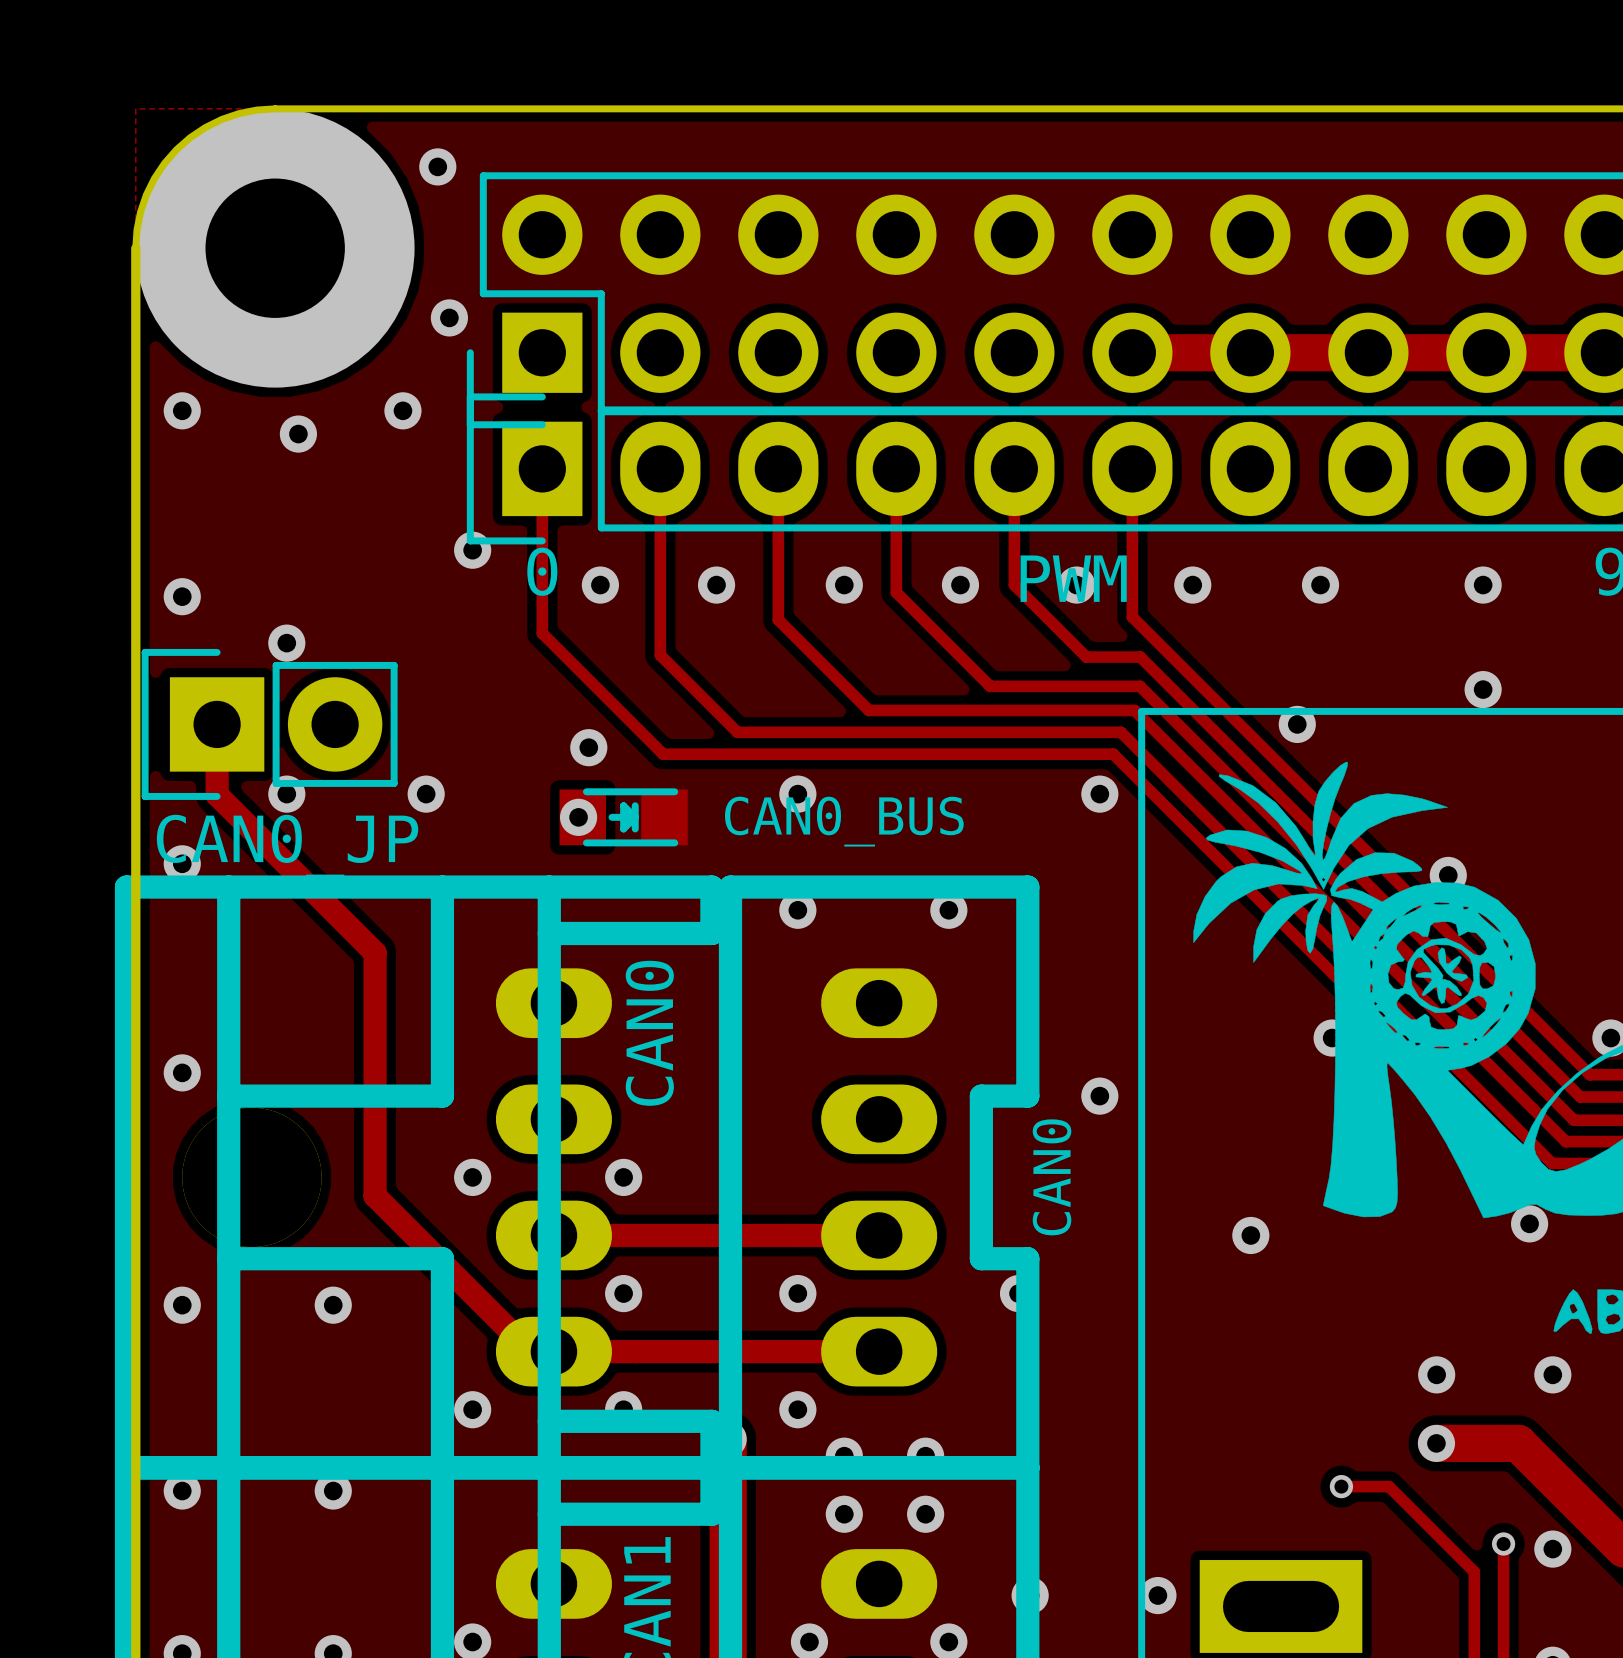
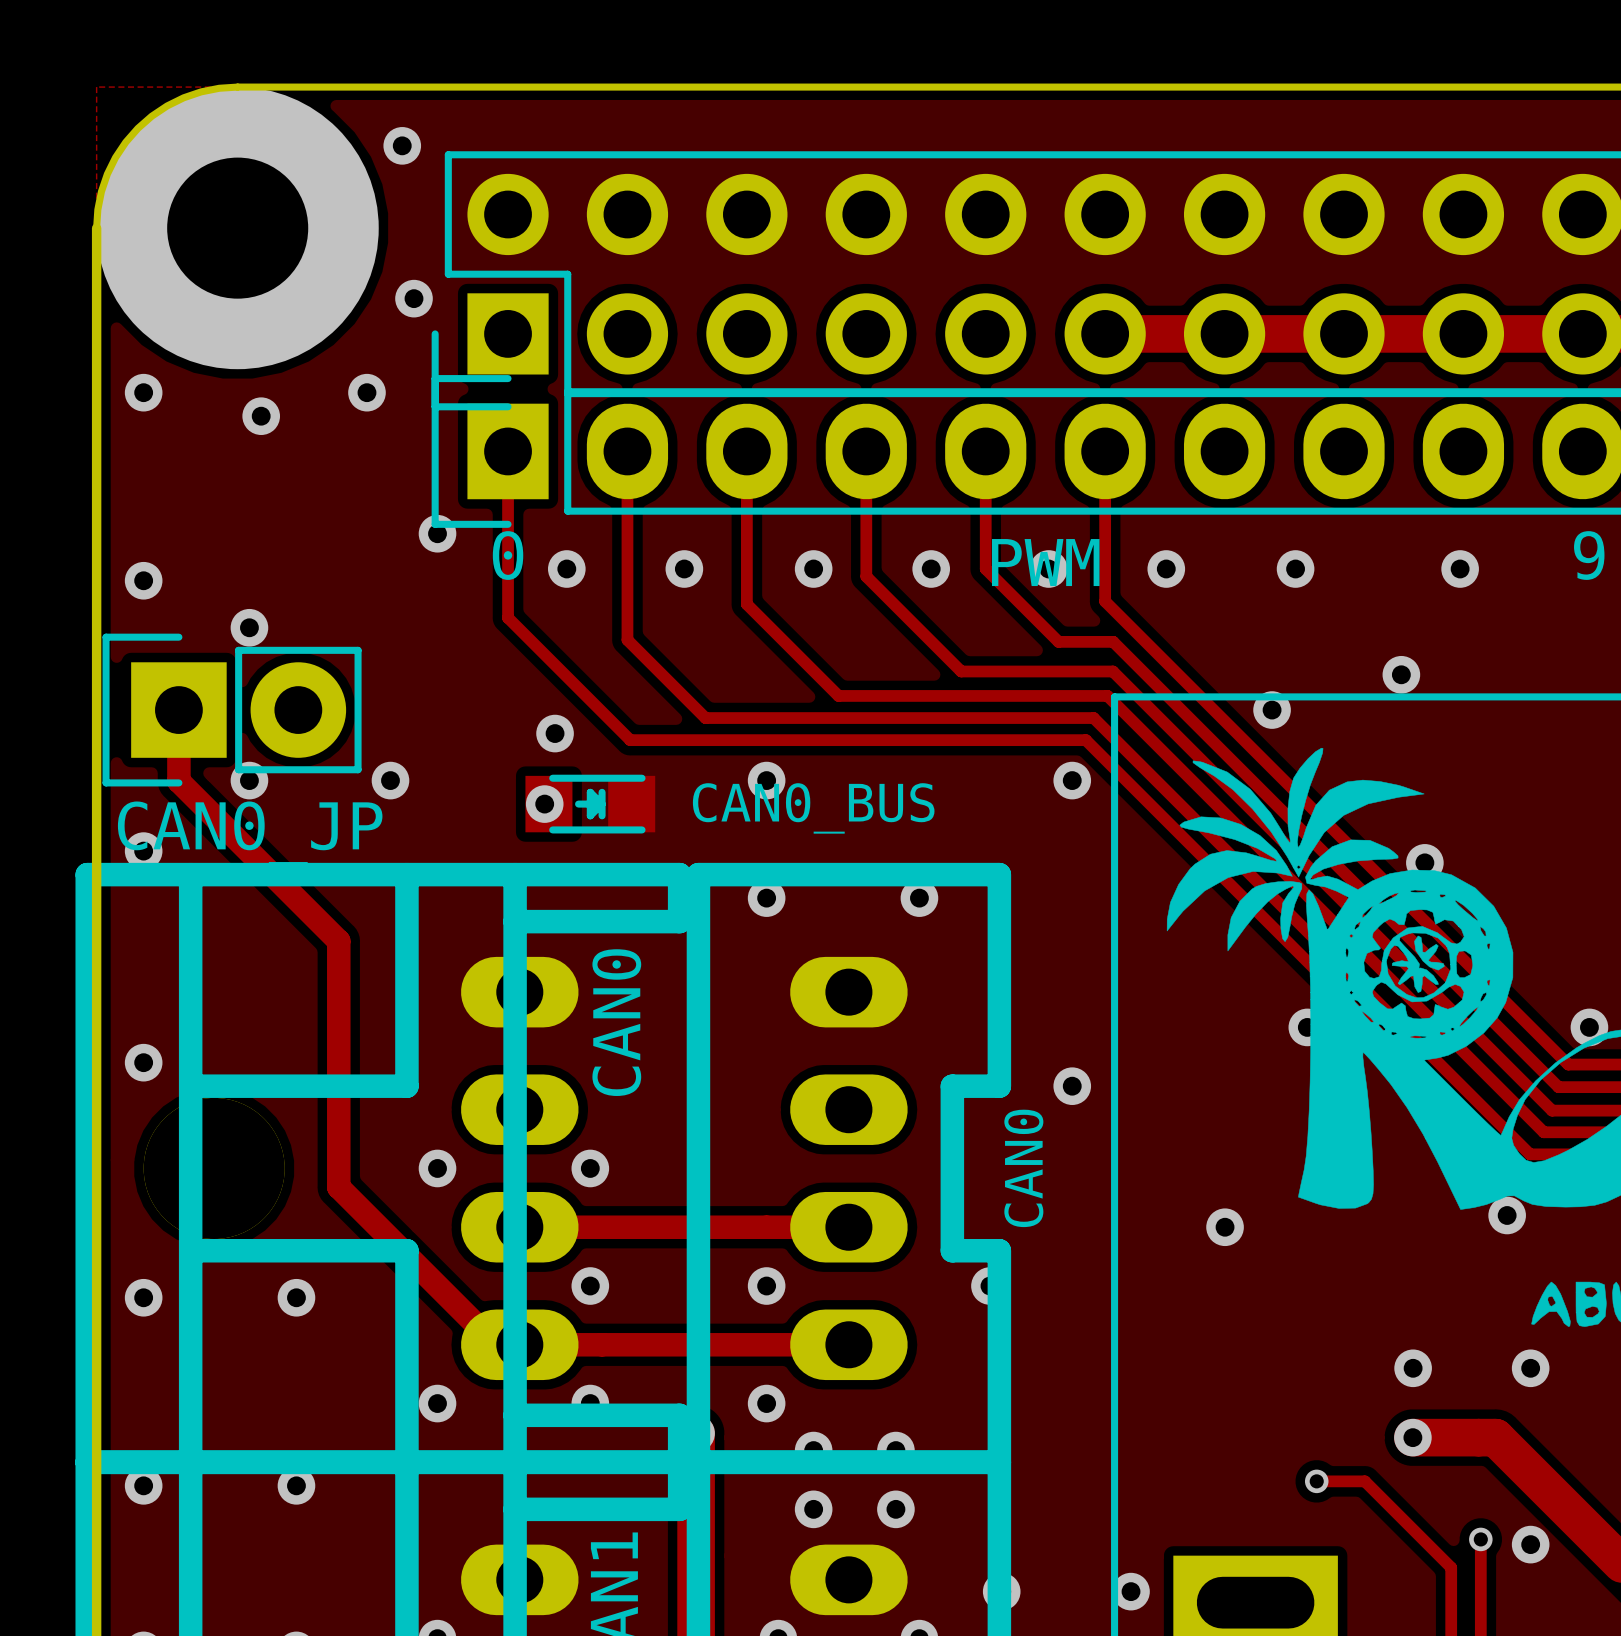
via position: (1483, 689) -> (1401, 674)

